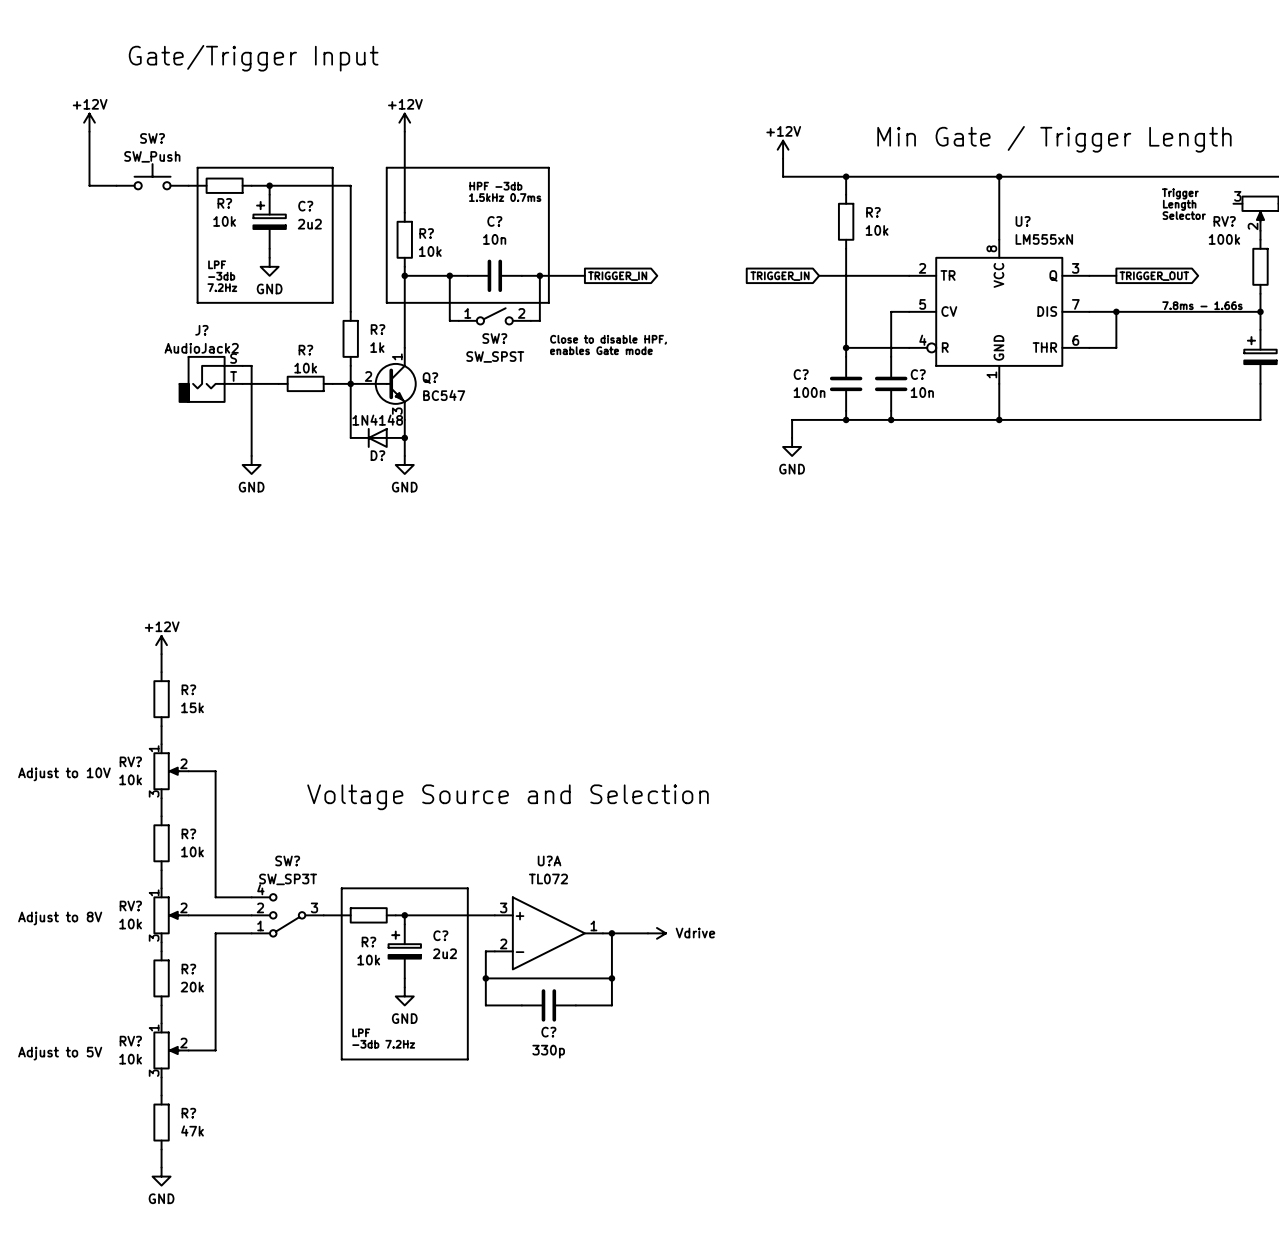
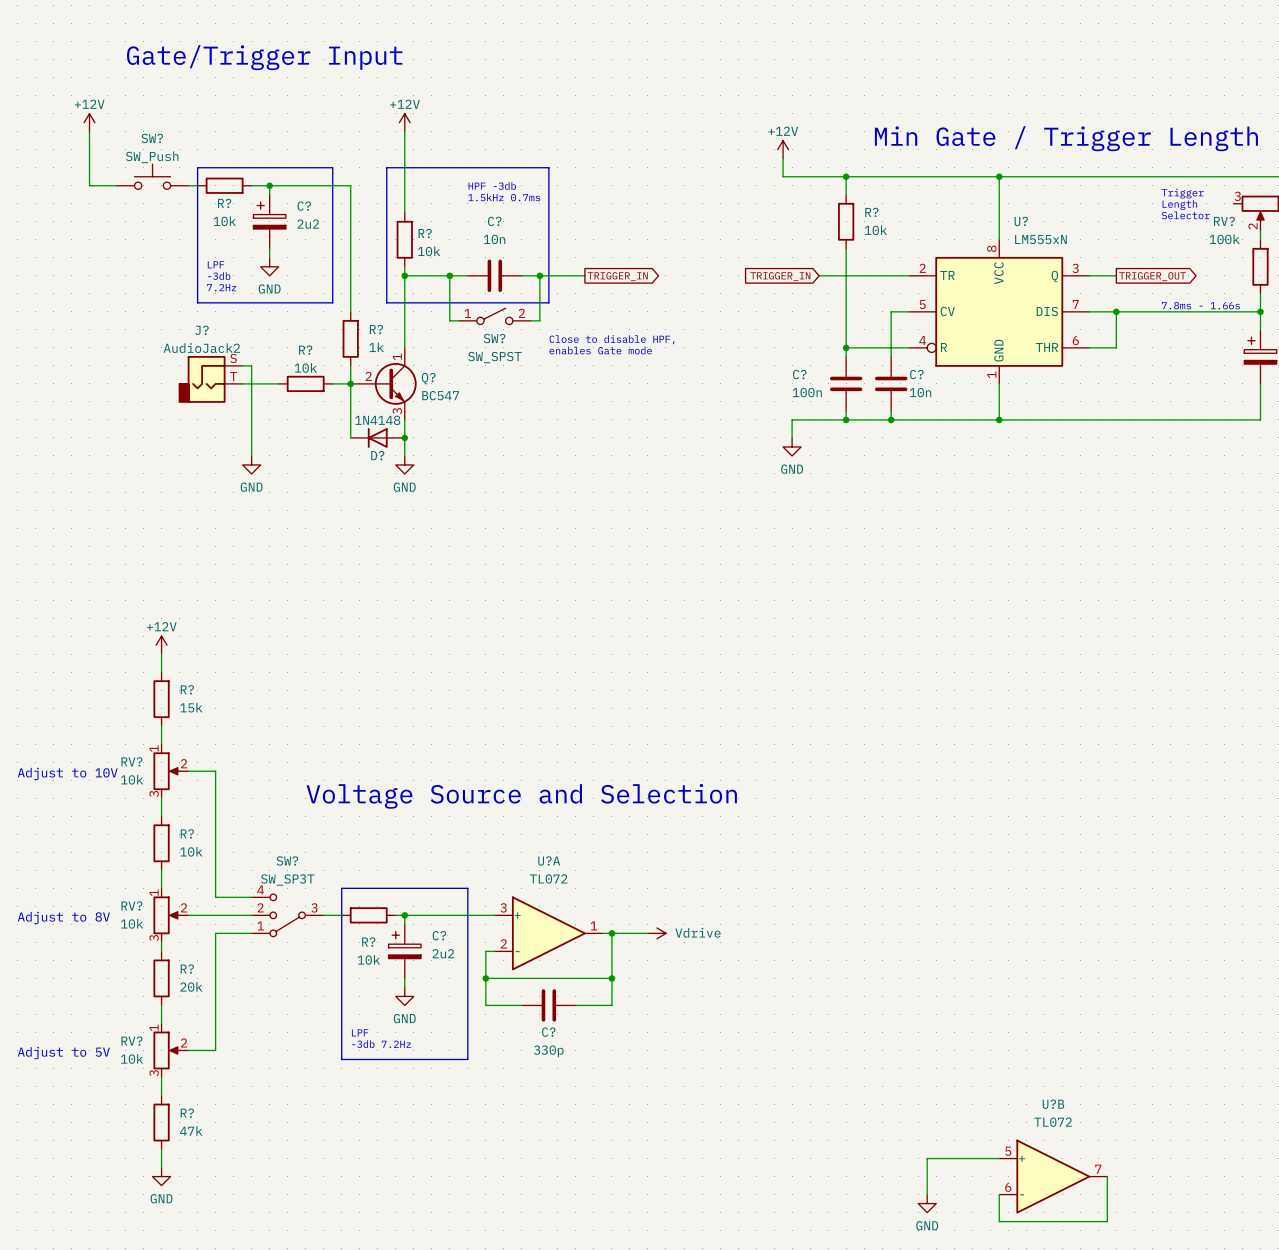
wire: none -> (999, 1158) (927, 1158) (927, 1194)
U?B: none -> TL072 (1053, 1176)
wire: none -> (1107, 1176) (1107, 1221) (999, 1221) (999, 1194)
power symbol: none -> GND (927, 1203)

